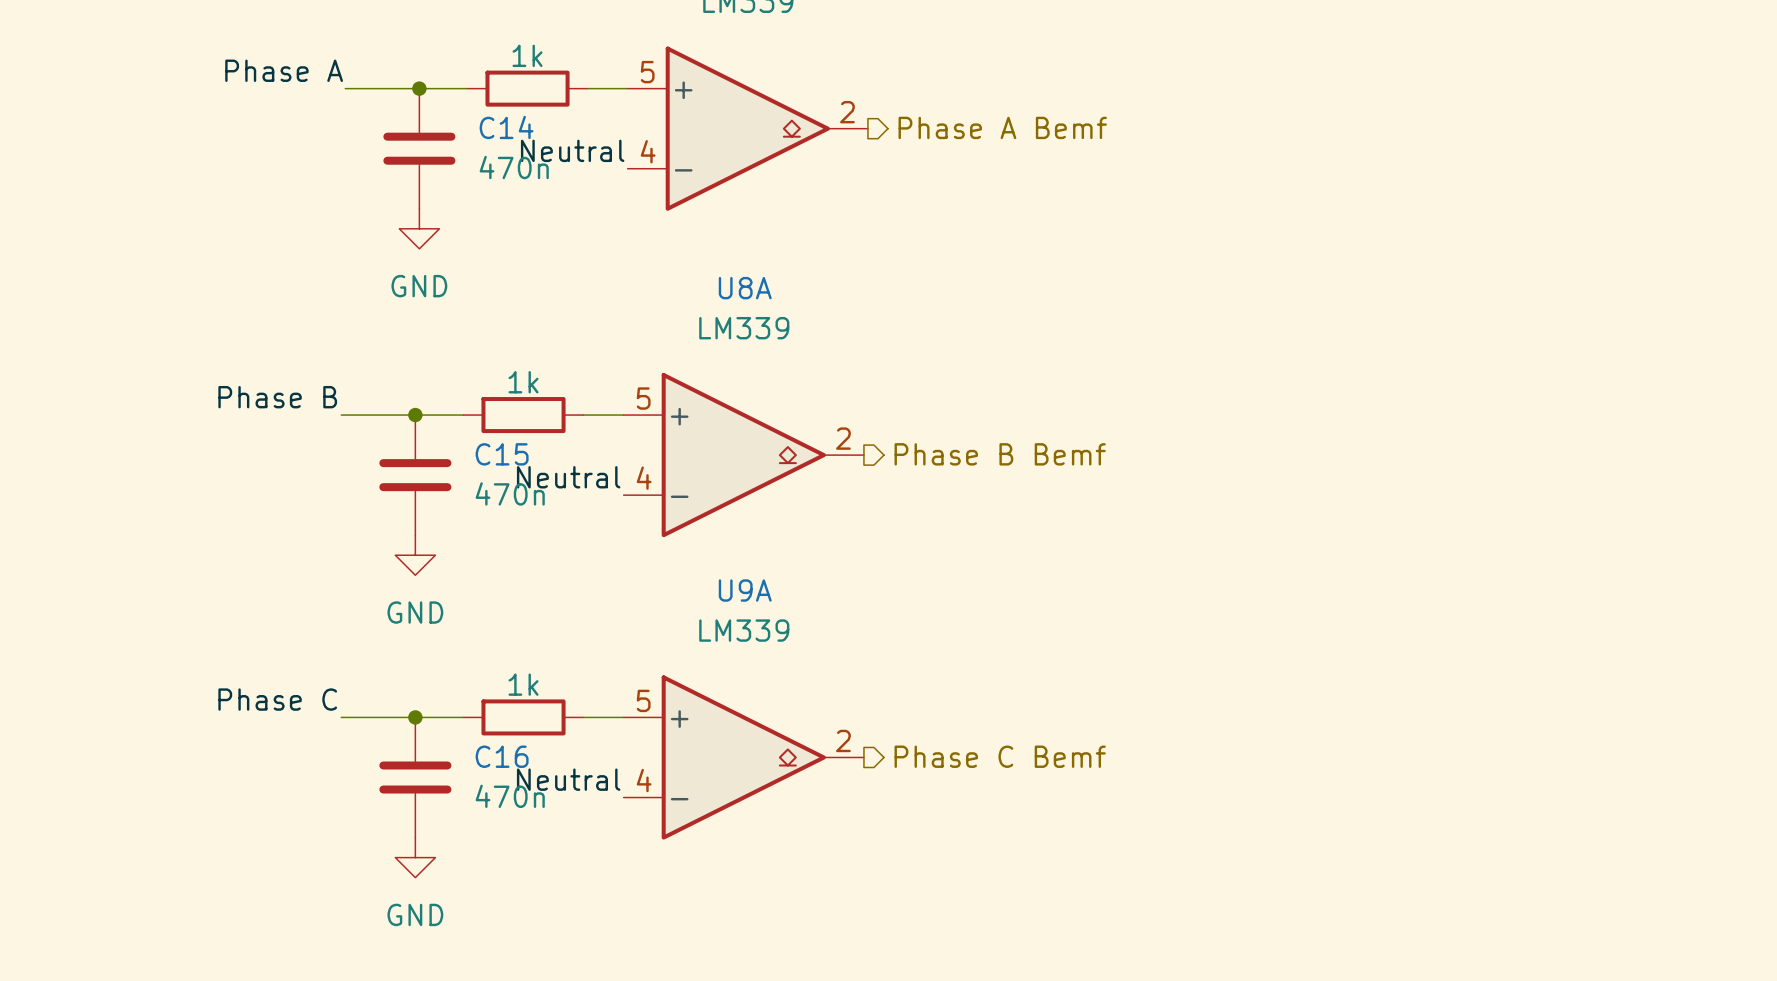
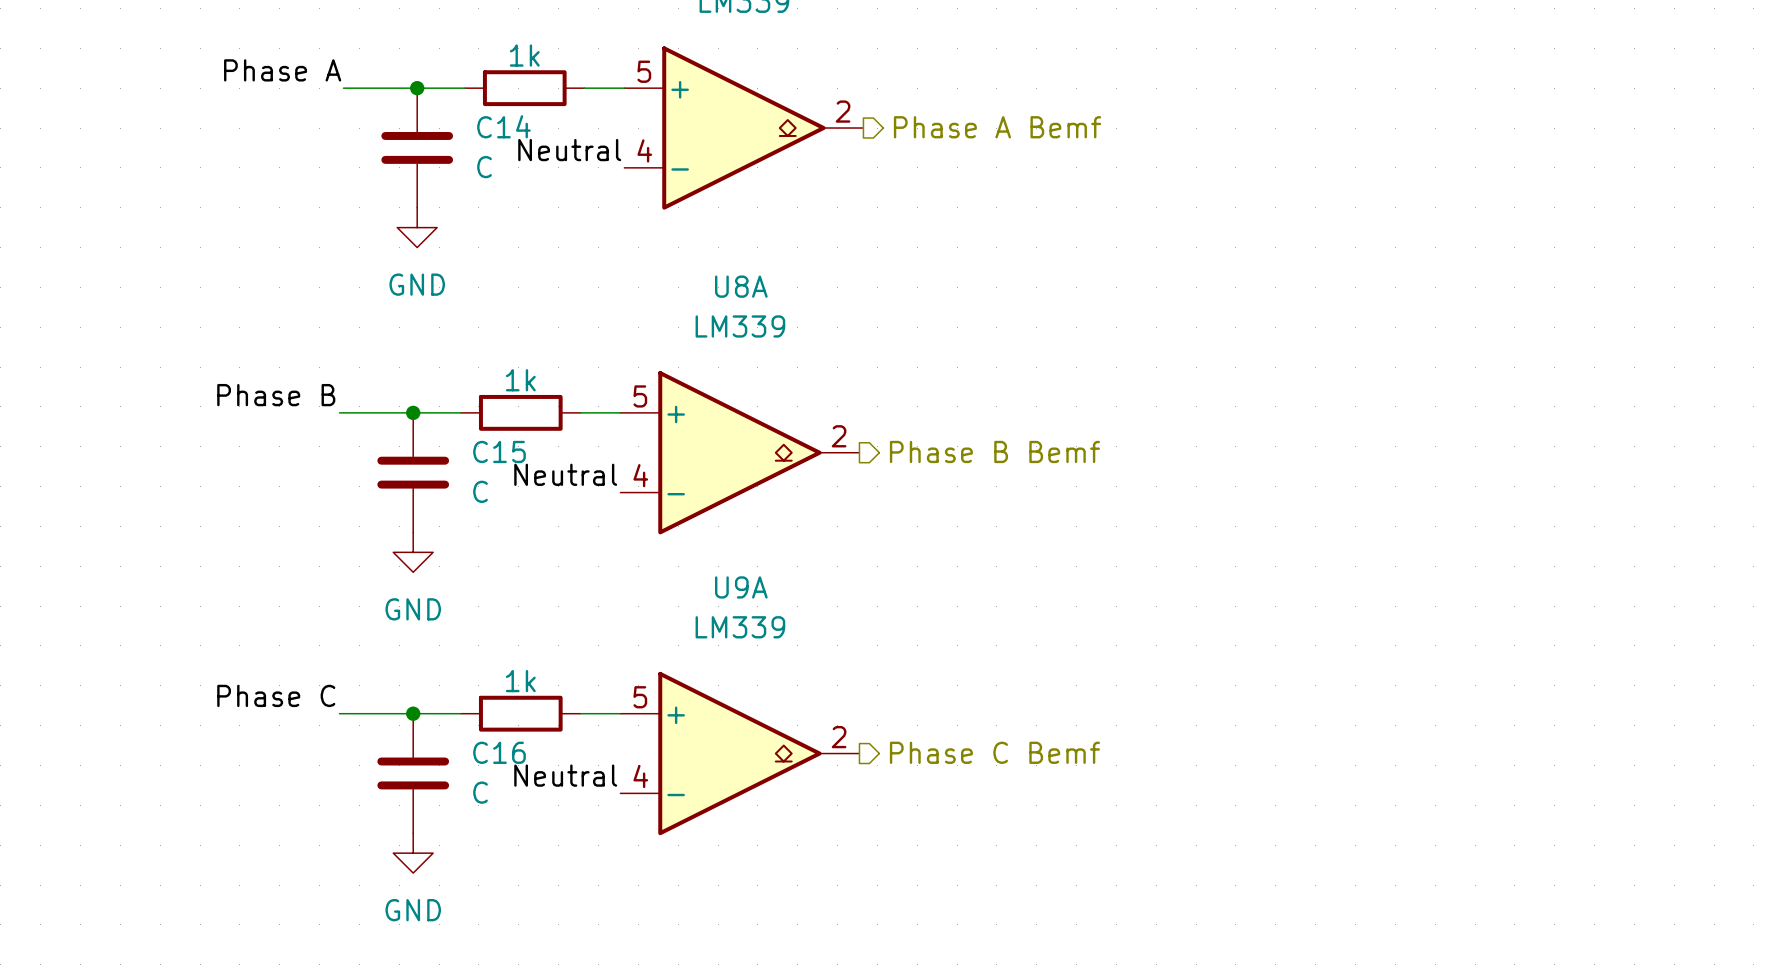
C14 value: 470n (514, 167) -> C (484, 167)
C15 value: 470n (510, 493) -> C (480, 491)
C16 value: 470n (510, 796) -> C (480, 792)

